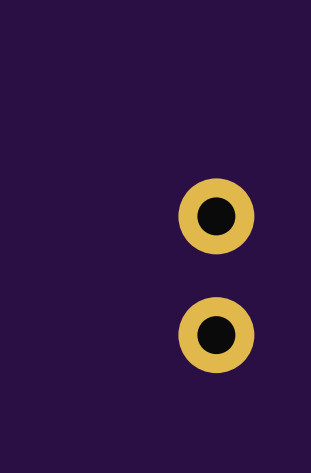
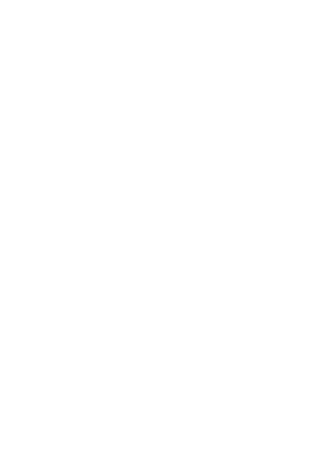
part: (216, 275) -> none

